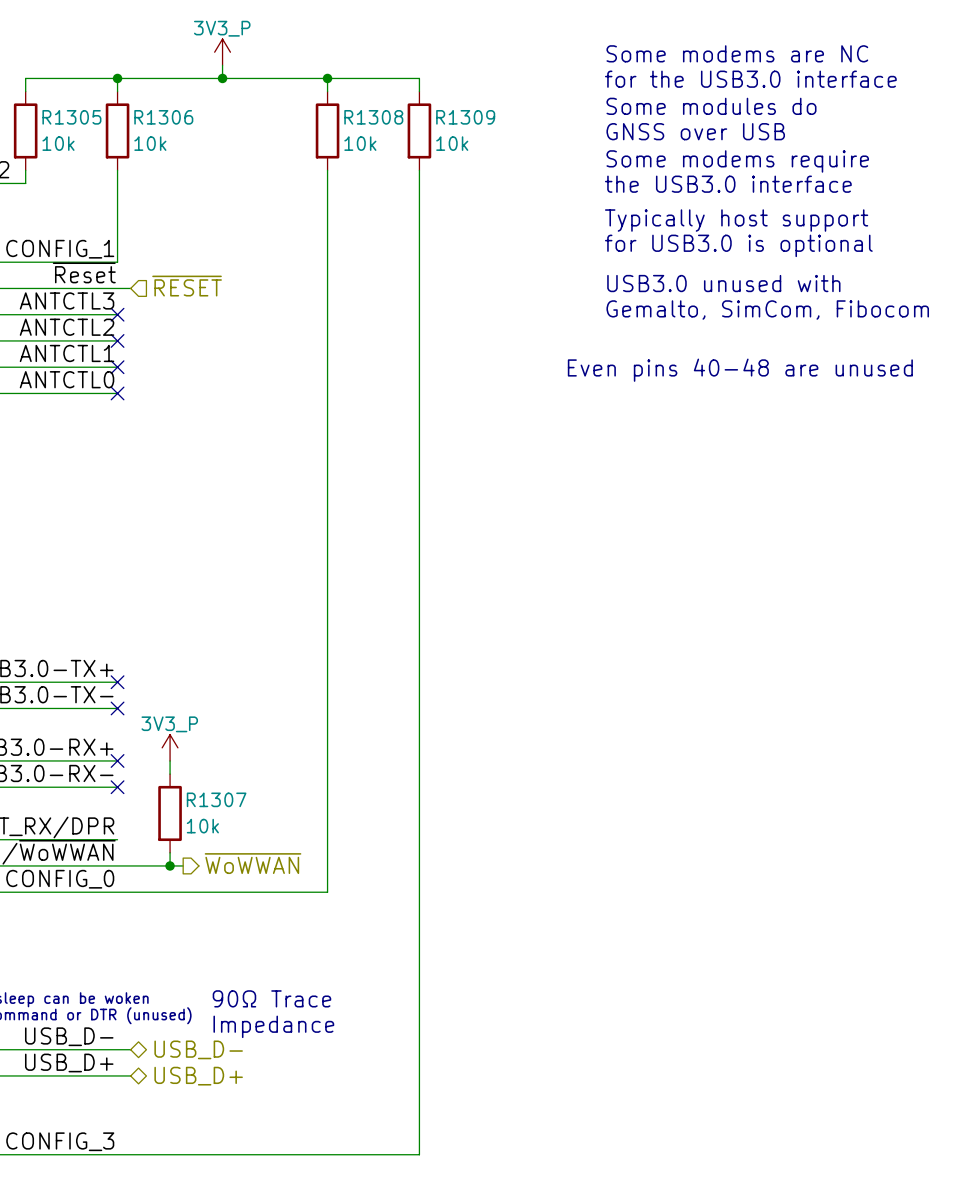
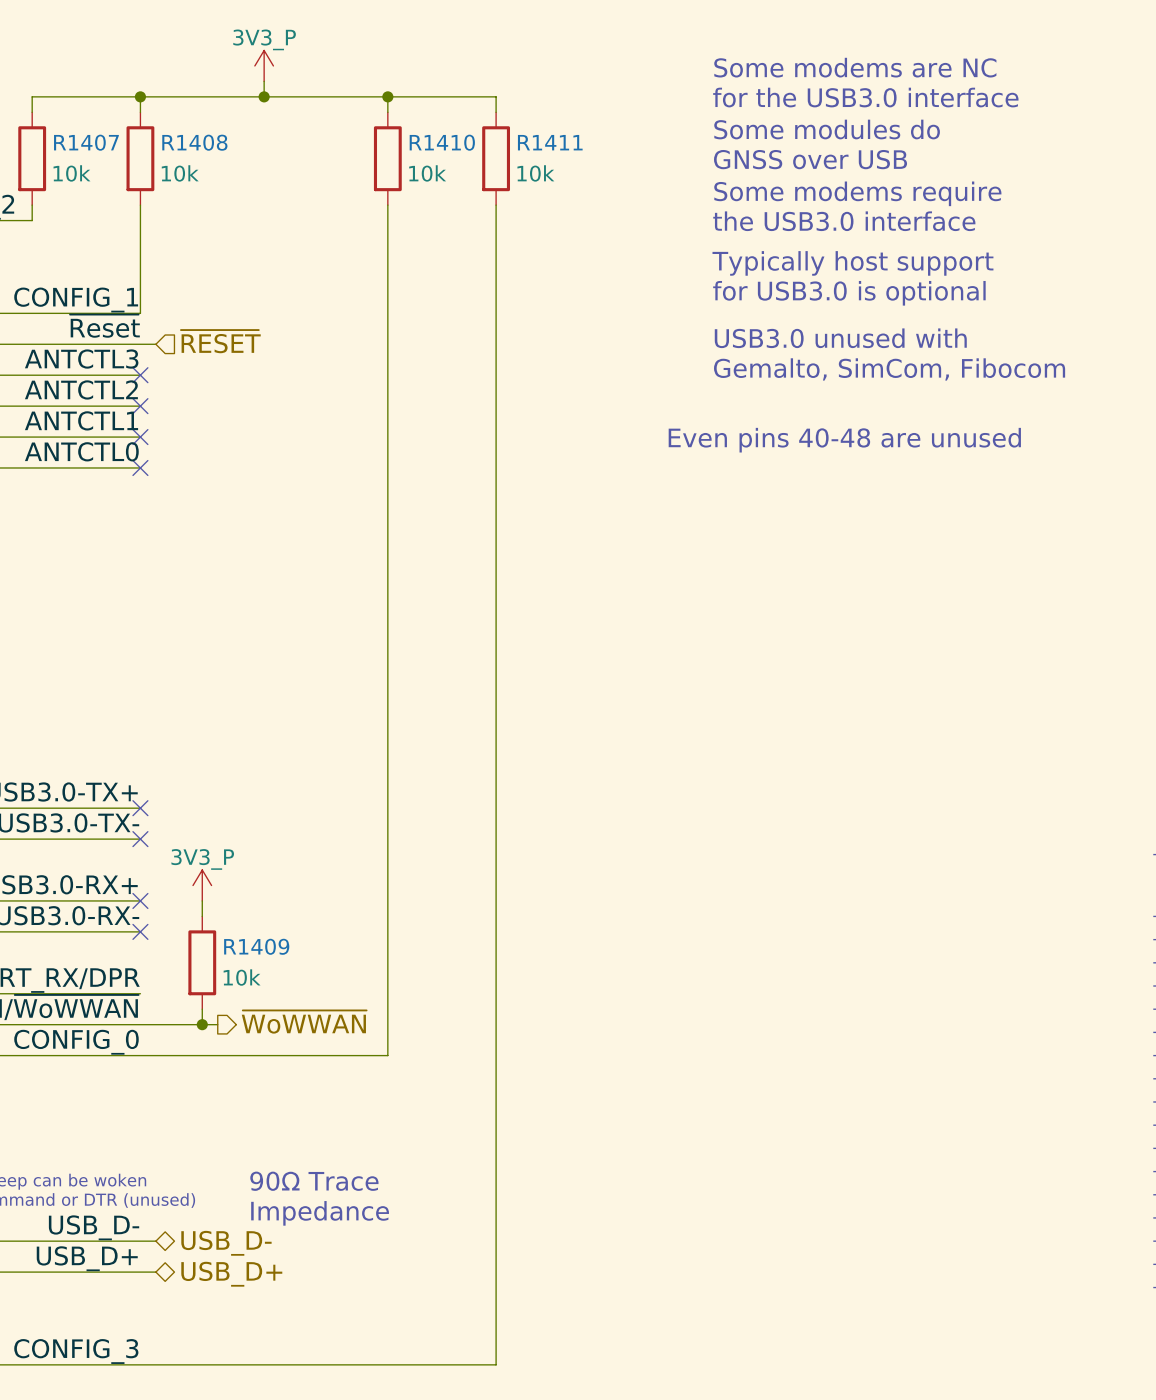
R1305 name: R1305 (71, 117) -> R1407 (86, 142)
R1306 name: R1306 (163, 117) -> R1408 (194, 142)
R1308 name: R1308 (373, 117) -> R1410 (442, 142)
R1309 name: R1309 (465, 117) -> R1411 (550, 142)
R1307 name: R1307 (216, 799) -> R1409 (256, 946)

